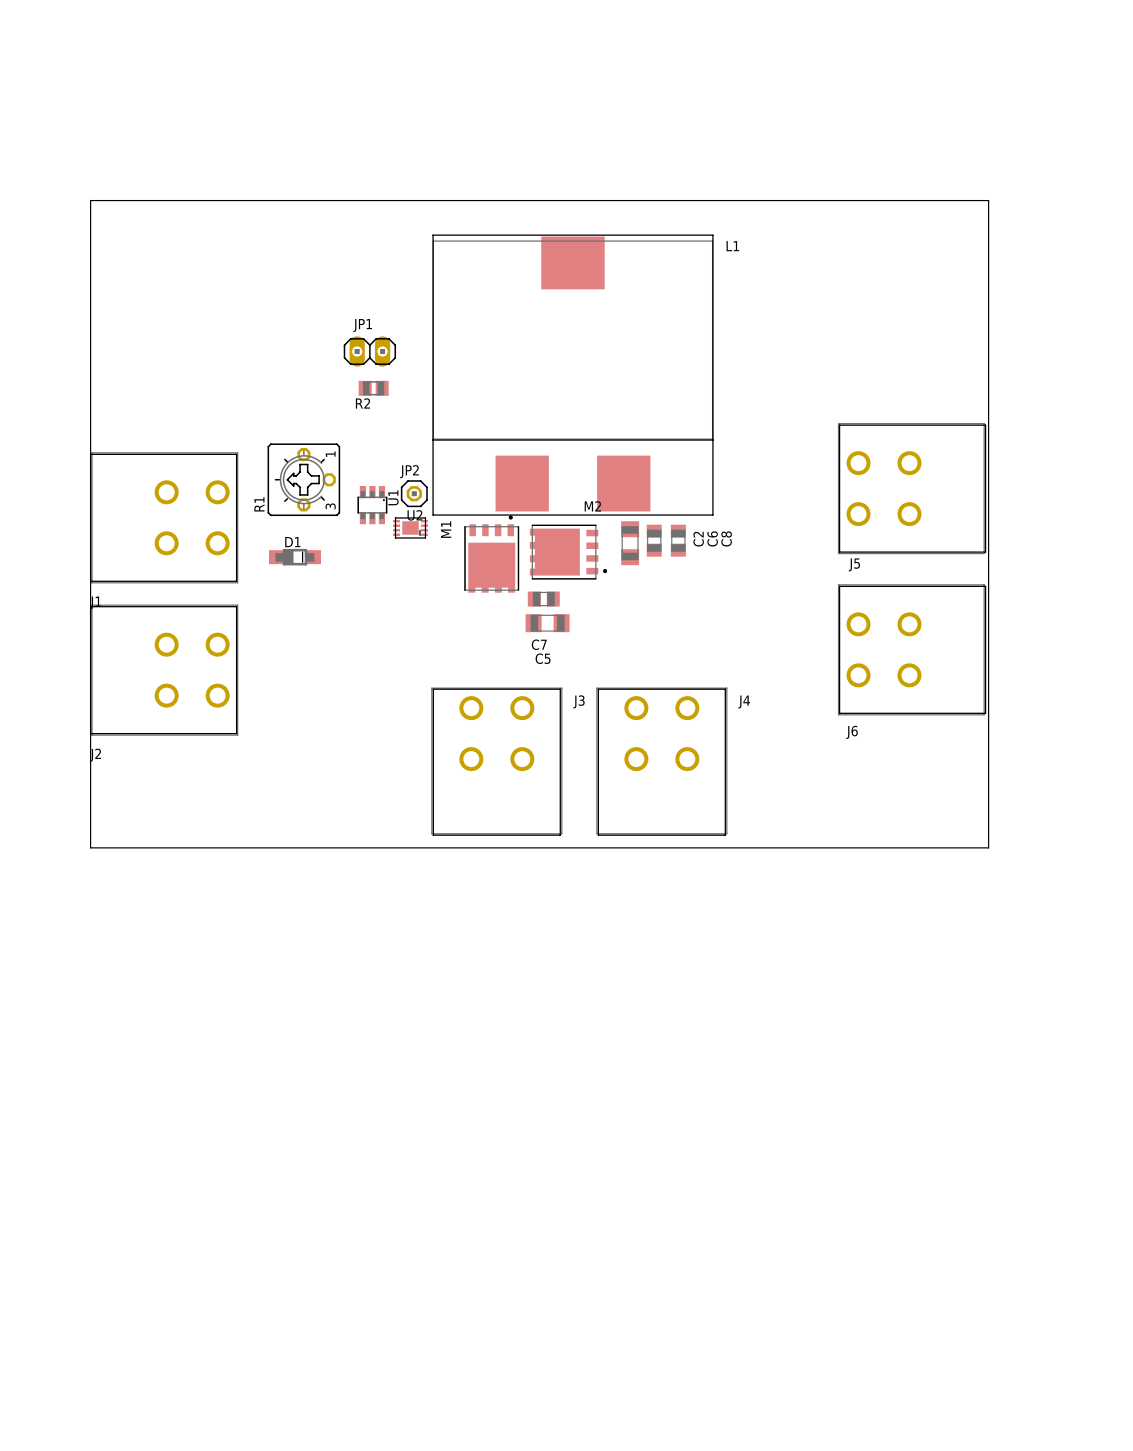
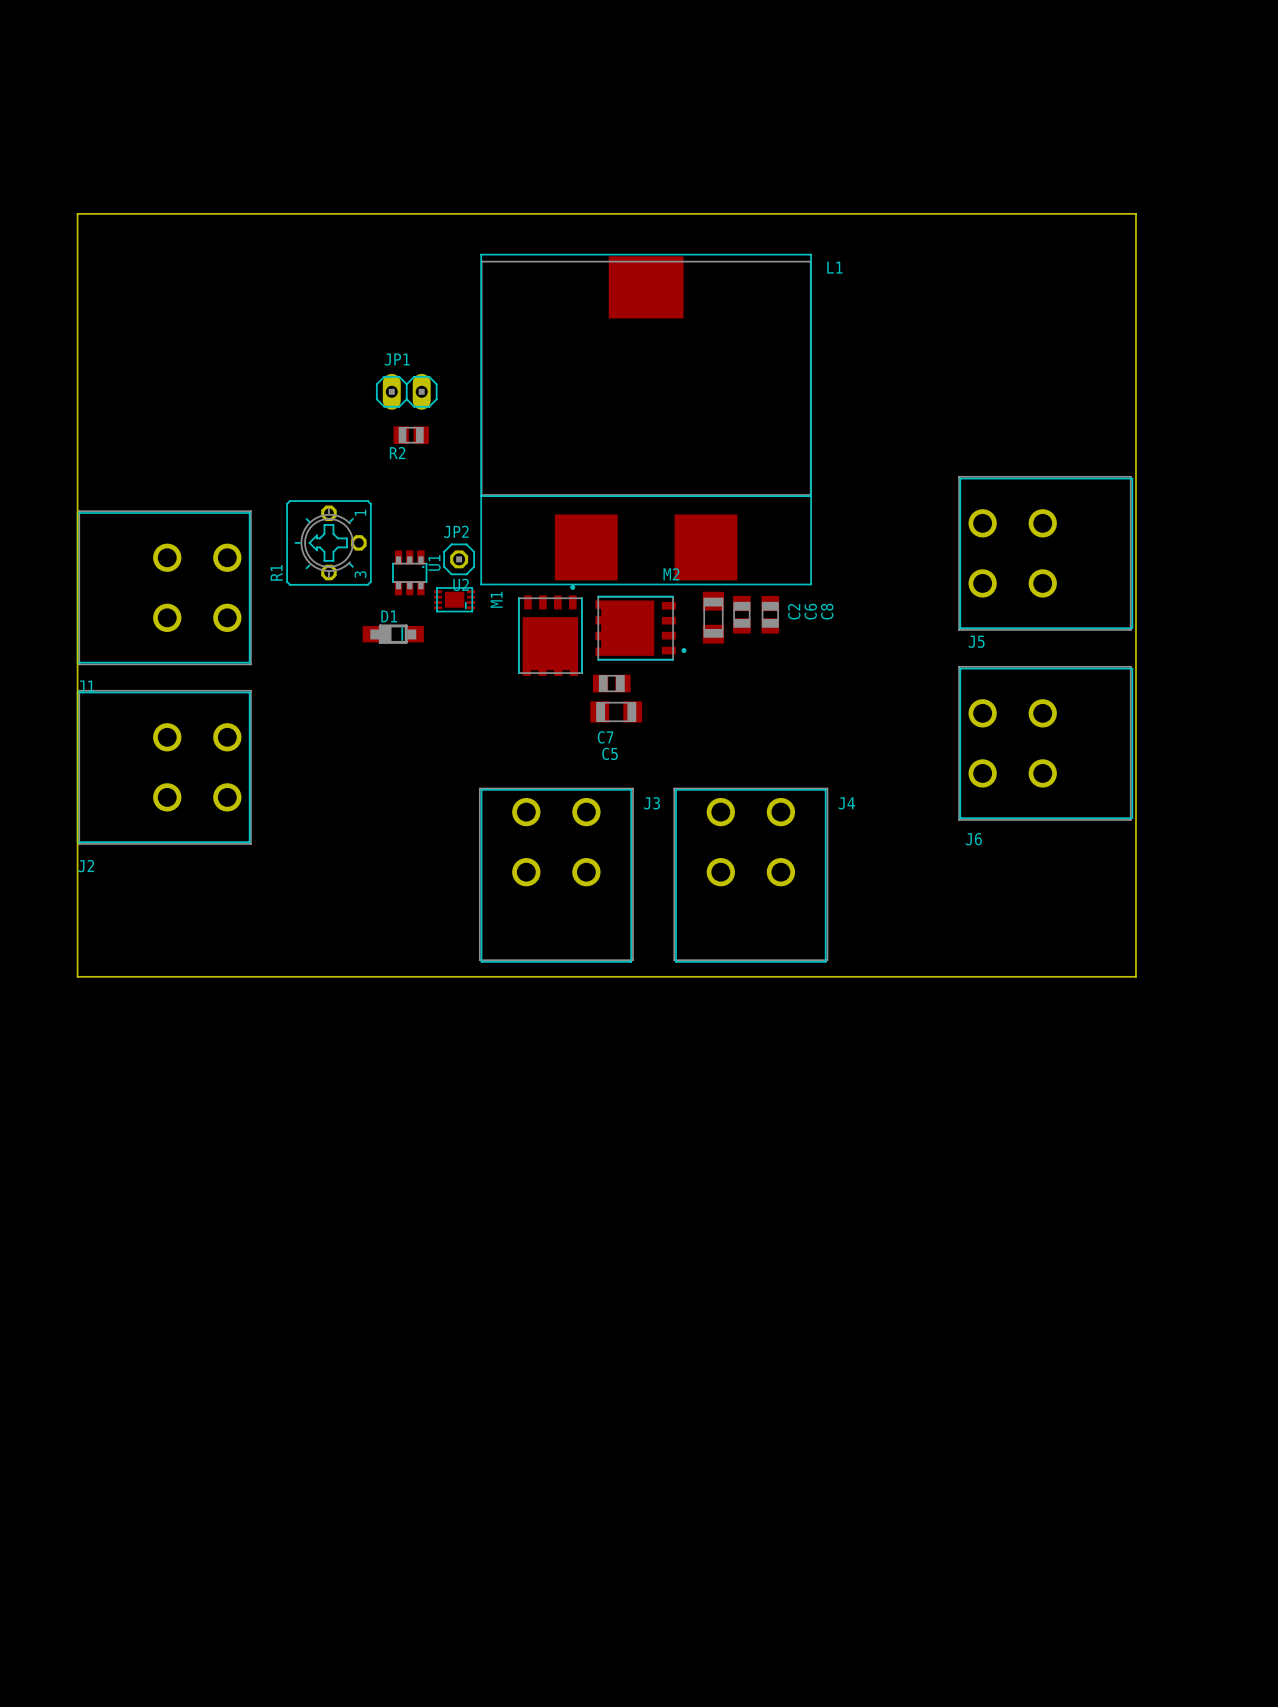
D1 position: (294, 557) -> (393, 634)

